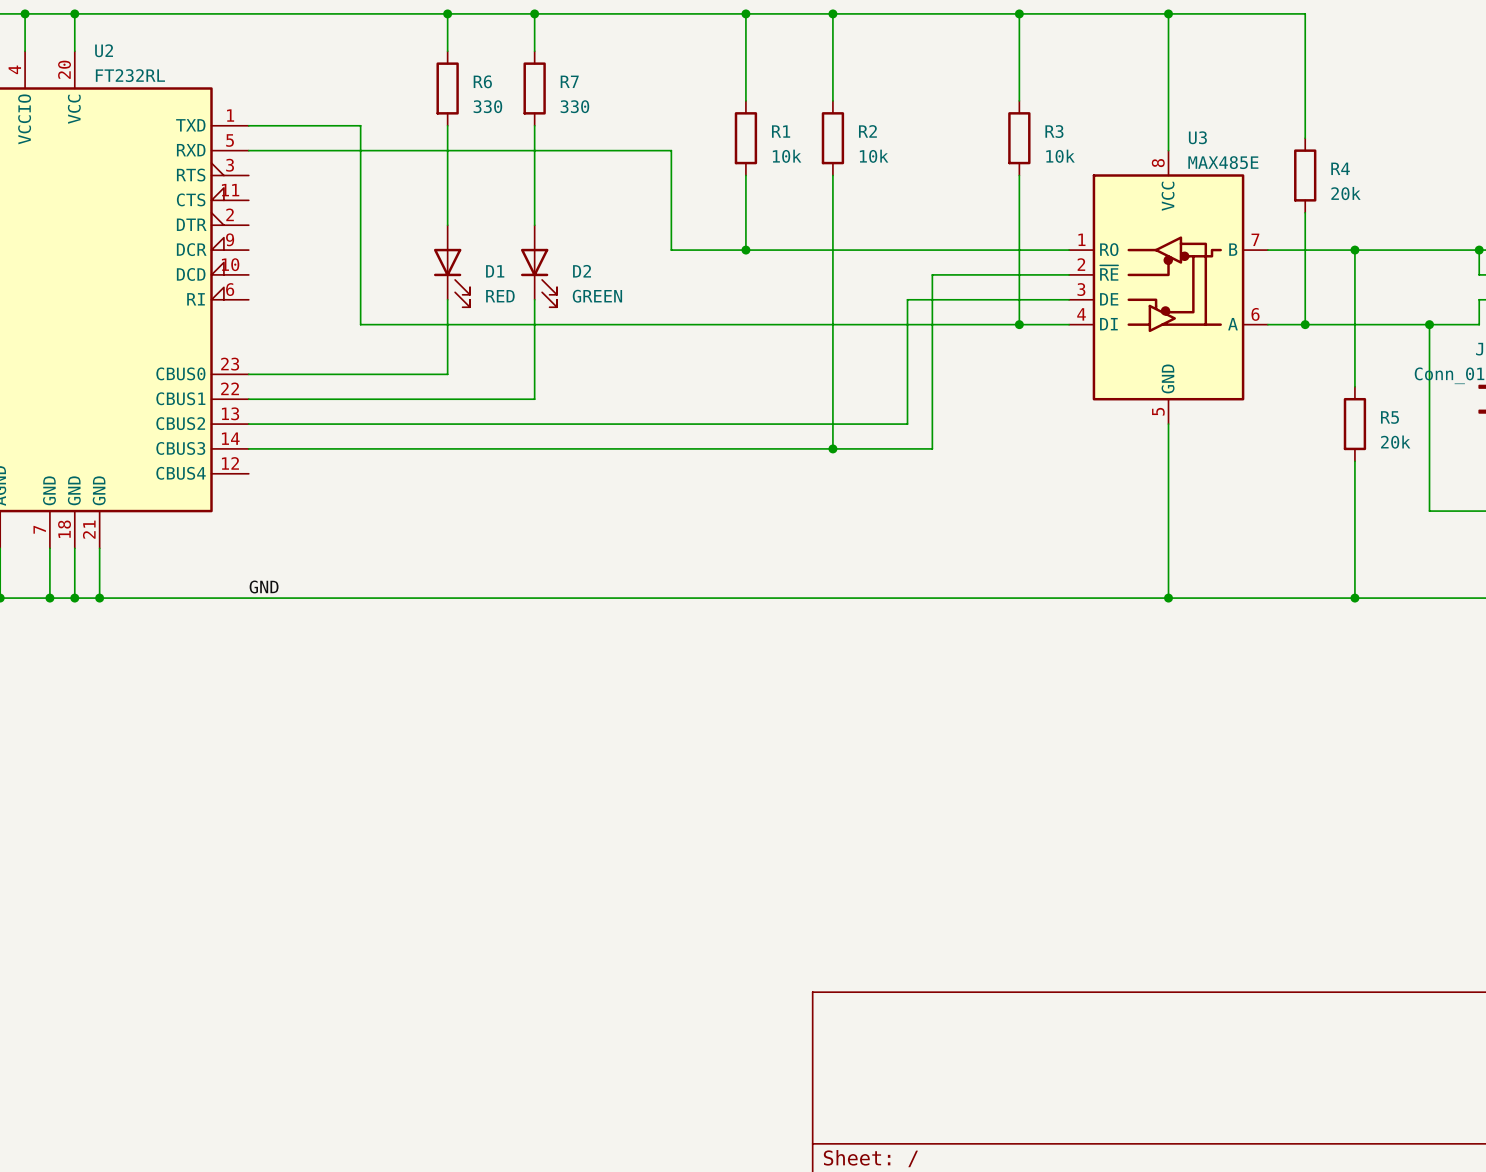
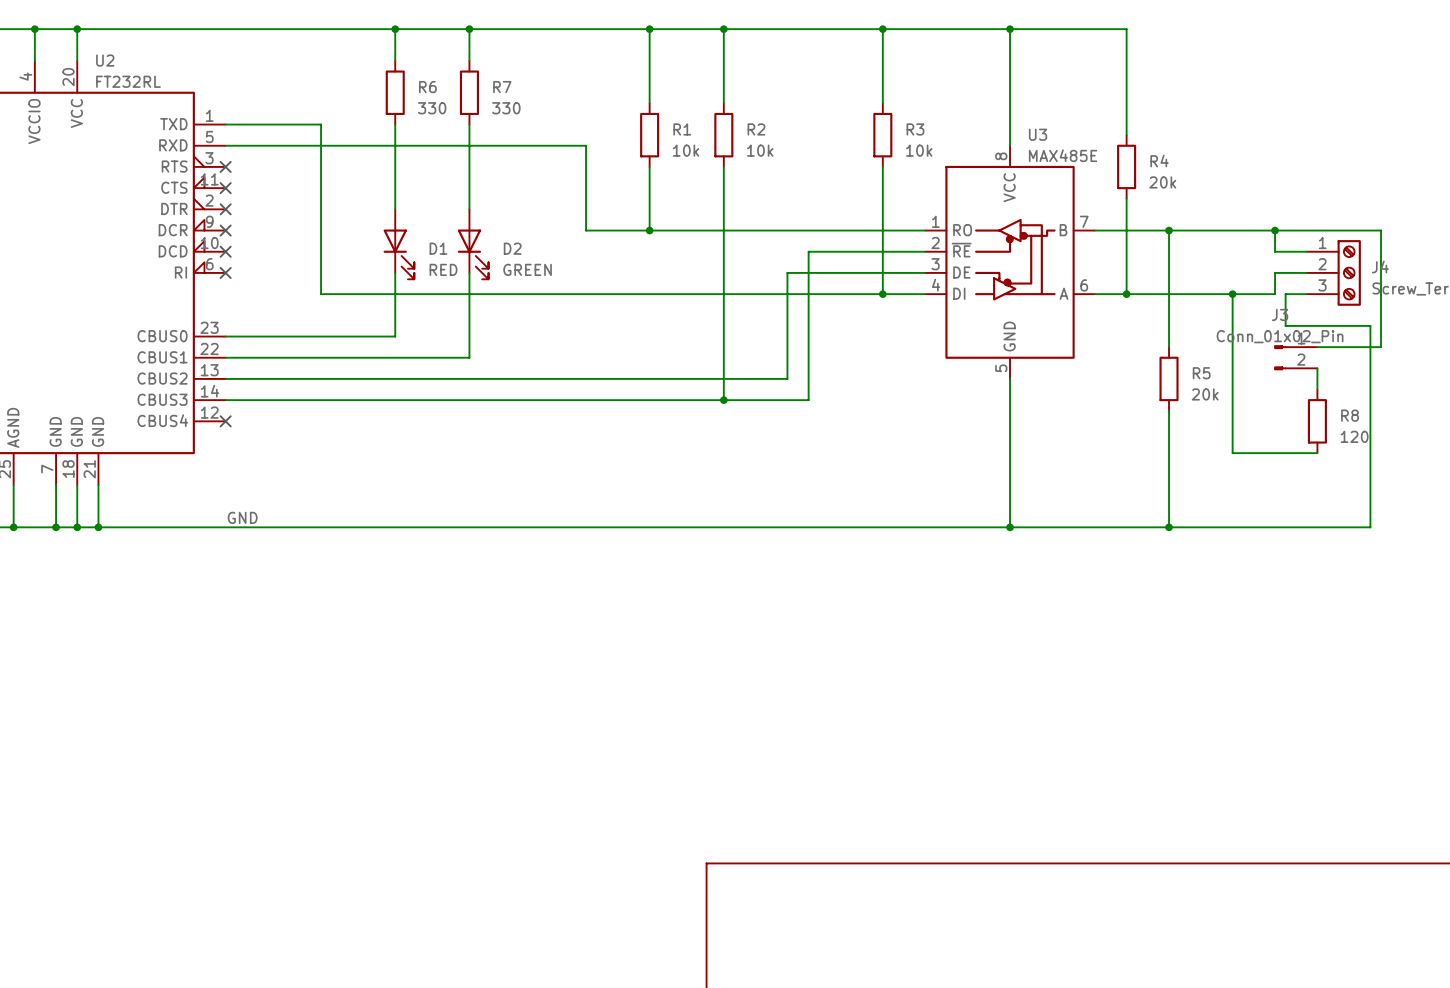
no-connect mark: none -> (225, 166)
no-connect mark: none -> (225, 188)
no-connect mark: none -> (225, 209)
no-connect mark: none -> (225, 230)
no-connect mark: none -> (225, 251)
no-connect mark: none -> (225, 272)
no-connect mark: none -> (225, 421)

